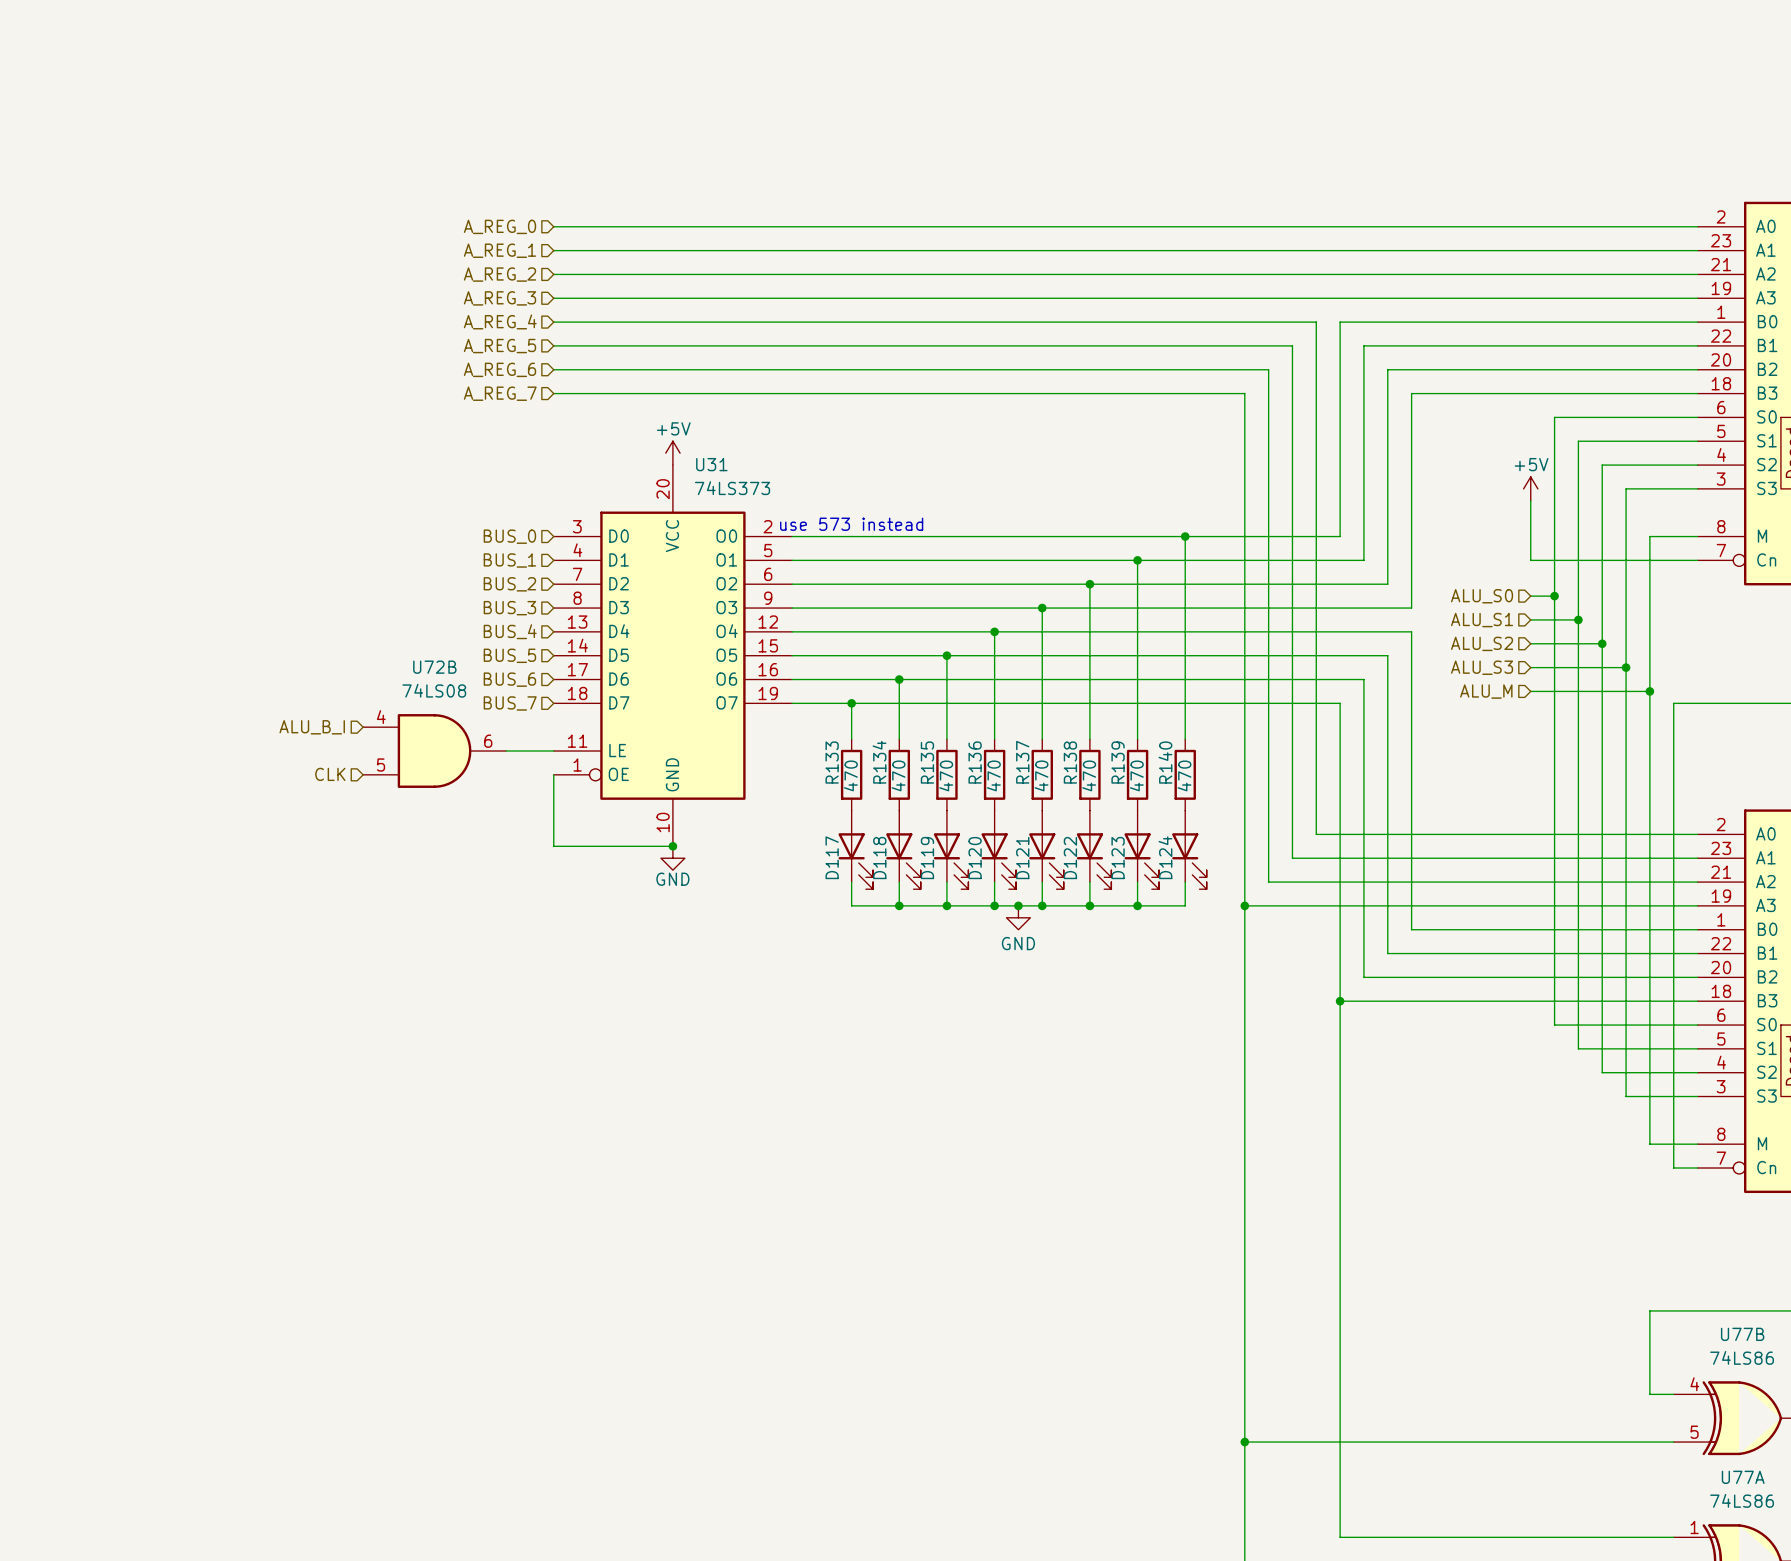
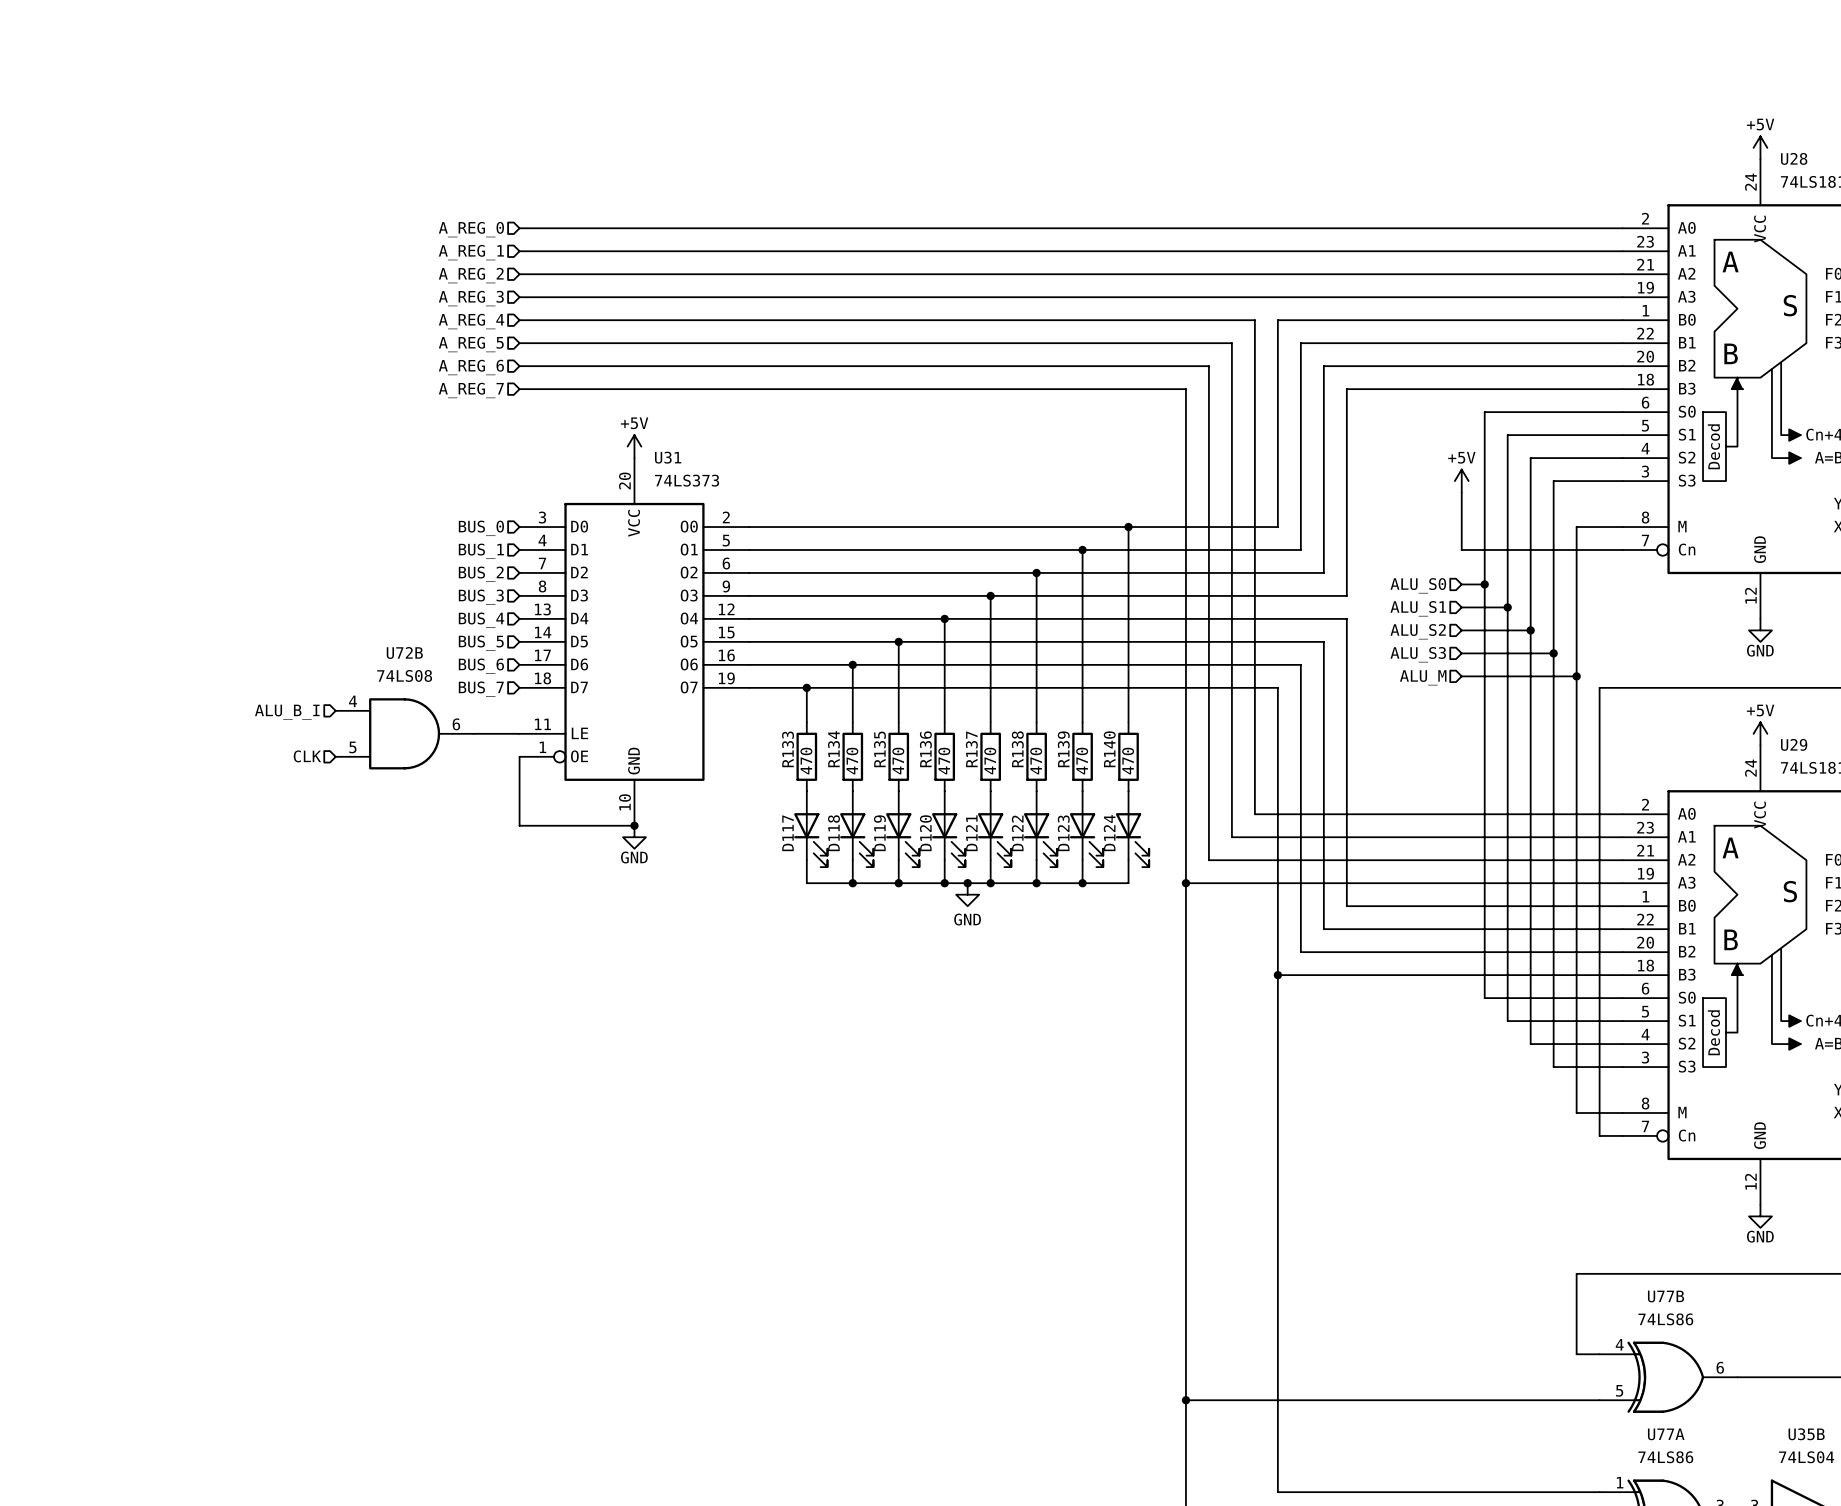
text: use 573 instead (851, 524) -> none

